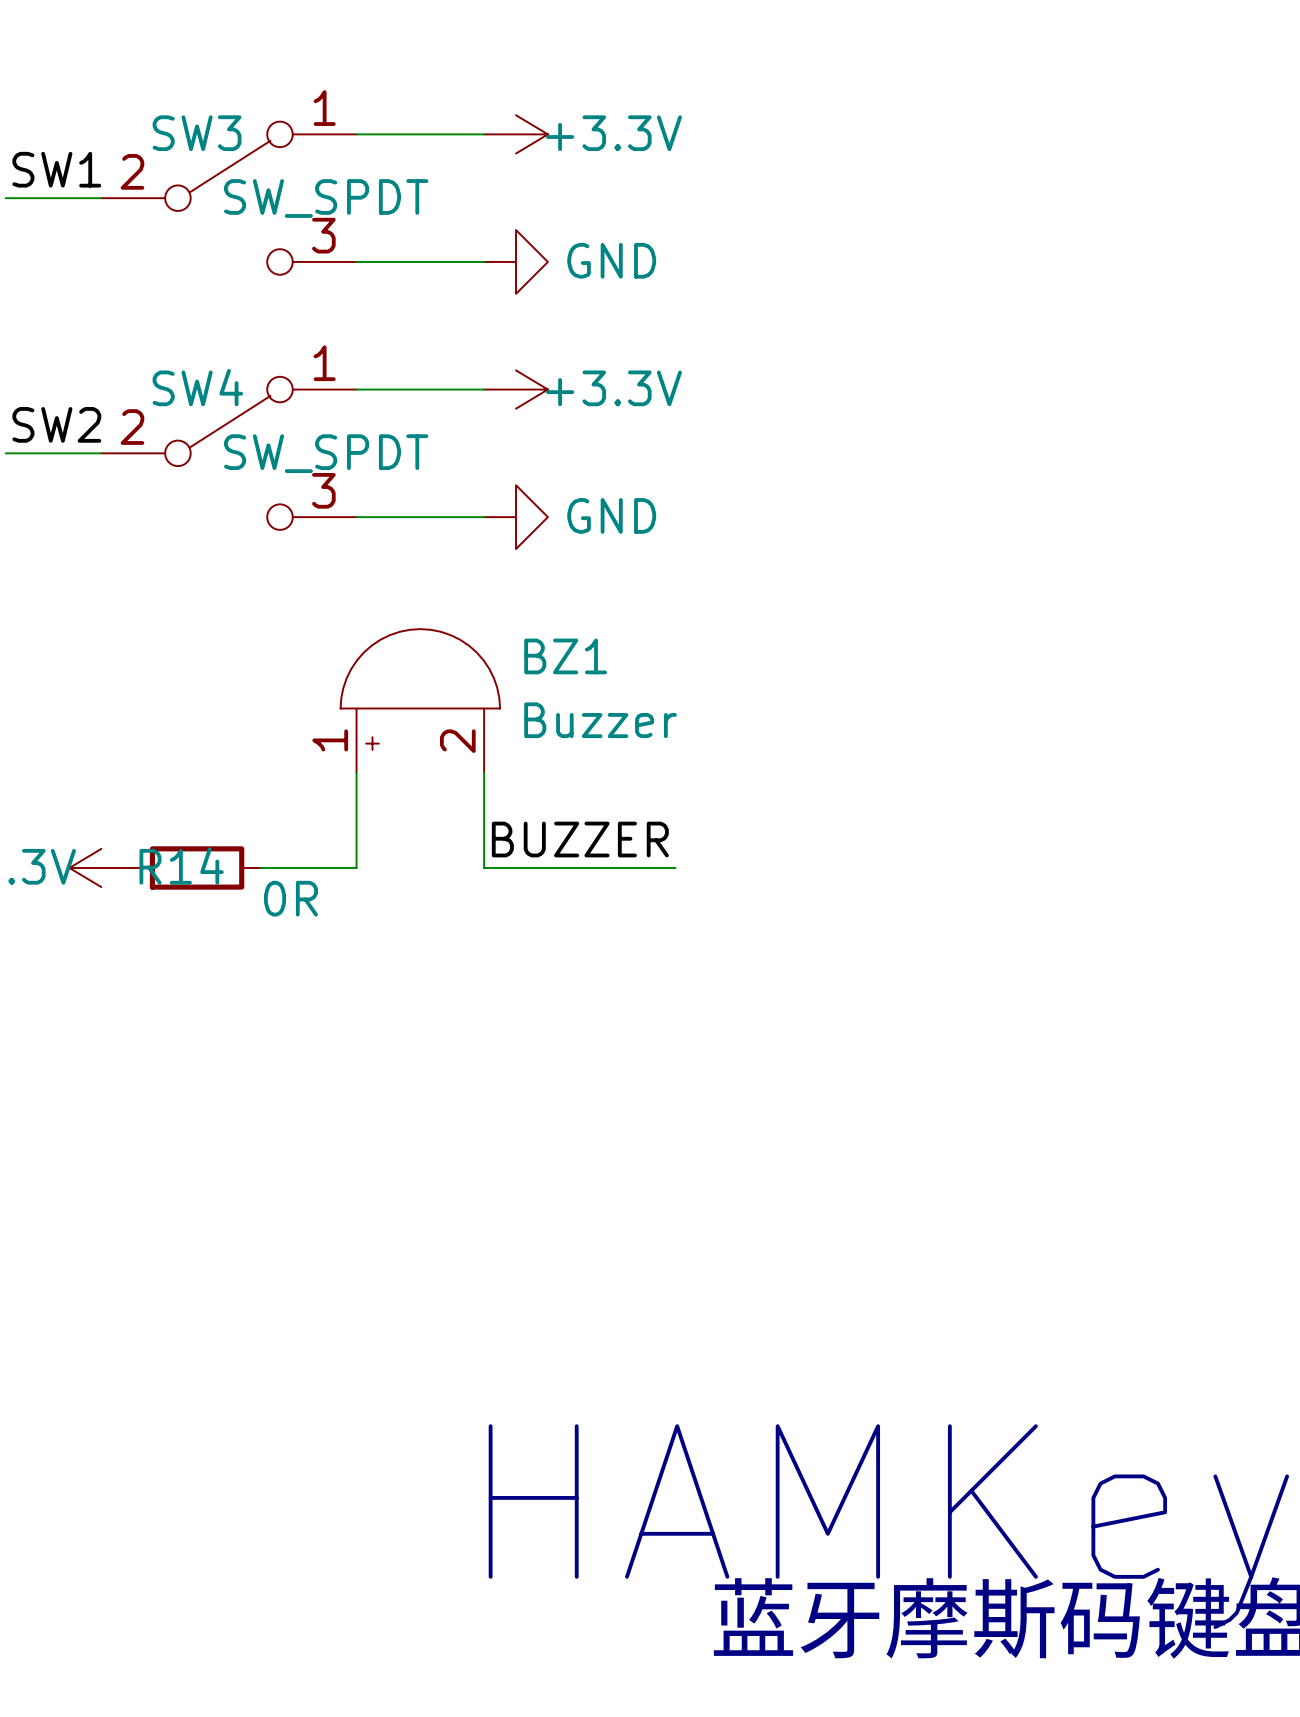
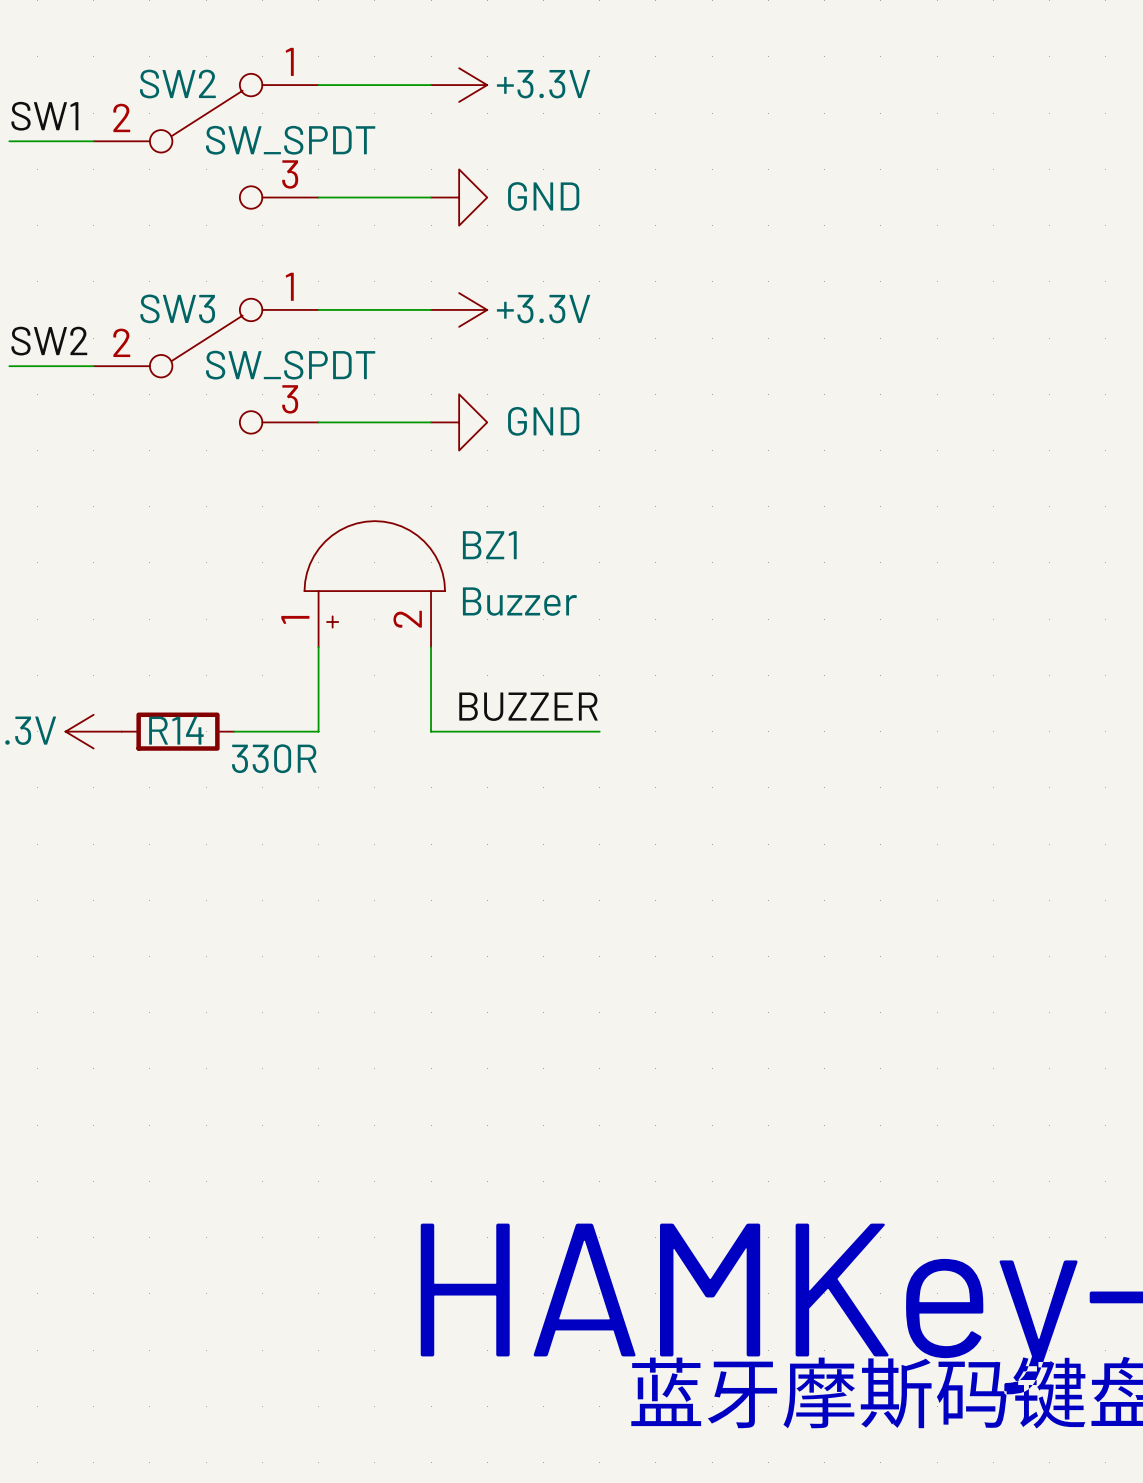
SW3 name: SW3 (197, 133) -> SW2 (177, 84)
SW4 name: SW4 (197, 387) -> SW3 (177, 308)
R14 value: 0R (290, 898) -> 330R (274, 758)

